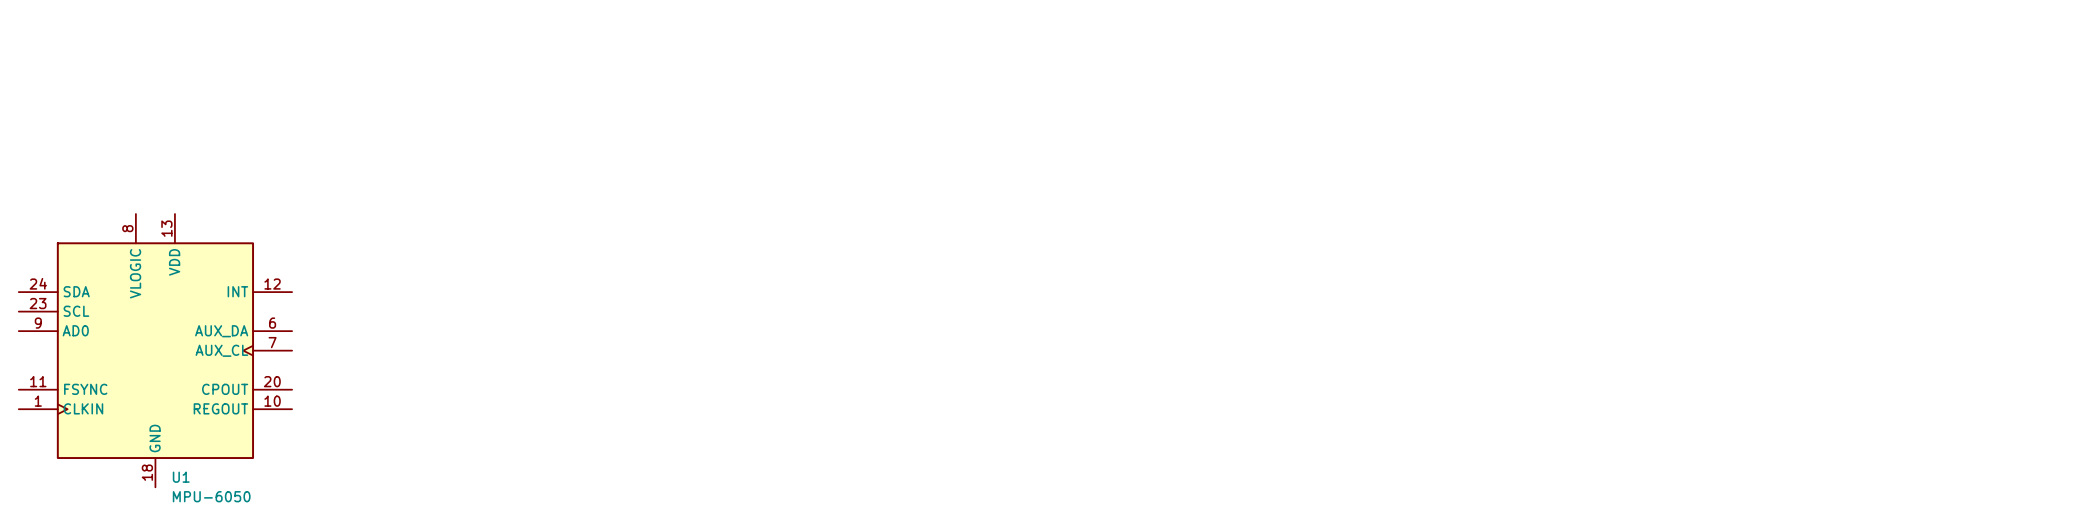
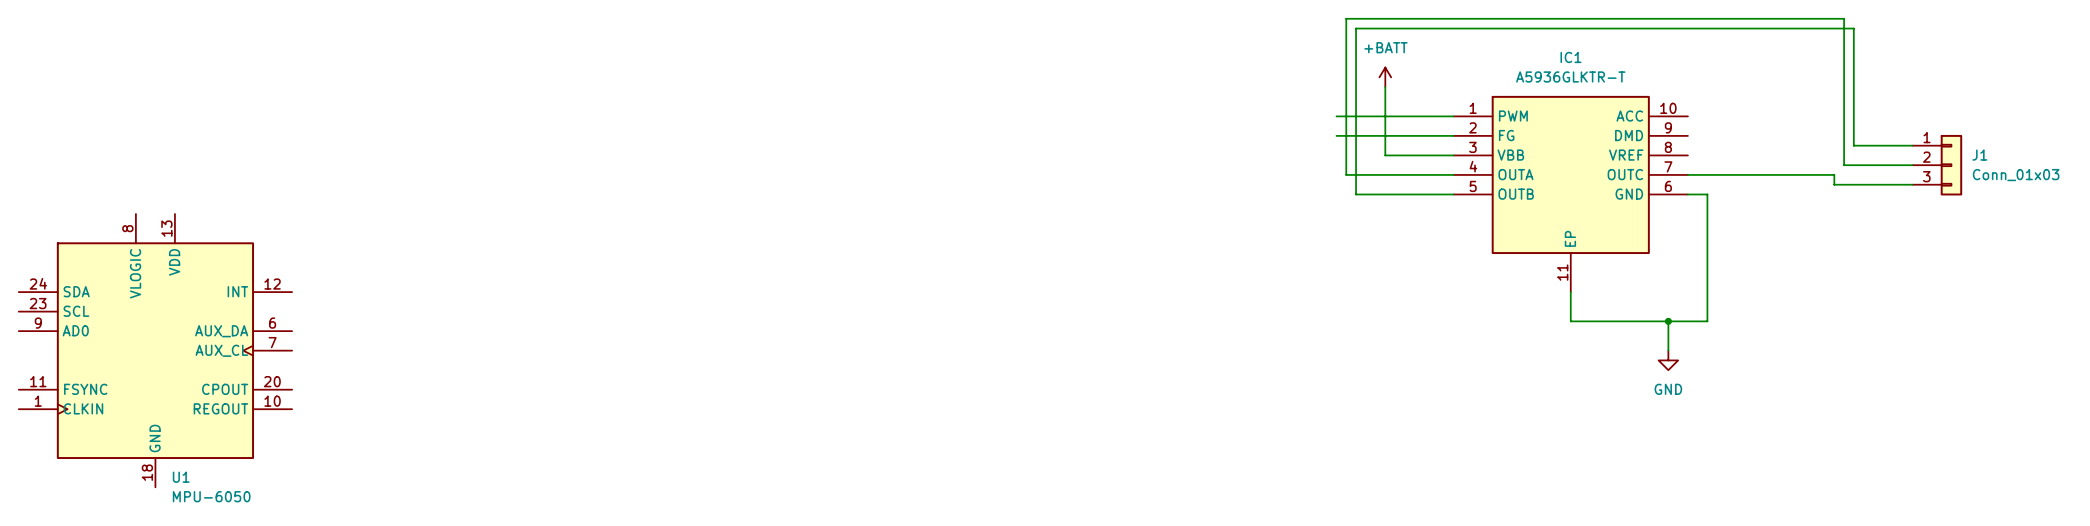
power symbol: none -> +BATT (1385, 77)
wire: none -> (1385, 87) (1385, 155) (1453, 155)
wire: none -> (1336, 116) (1453, 116)
wire: none -> (1336, 135) (1453, 135)
wire: none -> (1912, 145) (1853, 145) (1853, 28) (1356, 28) (1356, 194) (1453, 194)
wire: none -> (1912, 165) (1844, 165) (1844, 18) (1346, 18) (1346, 174) (1453, 174)
J1: none -> Conn_01x03 (1937, 165)
wire: none -> (1687, 174) (1834, 174) (1834, 184) (1912, 184)
IC1: none -> A5936GLKTR-T (1570, 193)
wire: none -> (1687, 194) (1707, 194) (1707, 321) (1570, 321) (1570, 292)
wire: none -> (1668, 321) (1668, 350)
junction: none -> (1668, 321)
power symbol: none -> GND (1668, 360)

